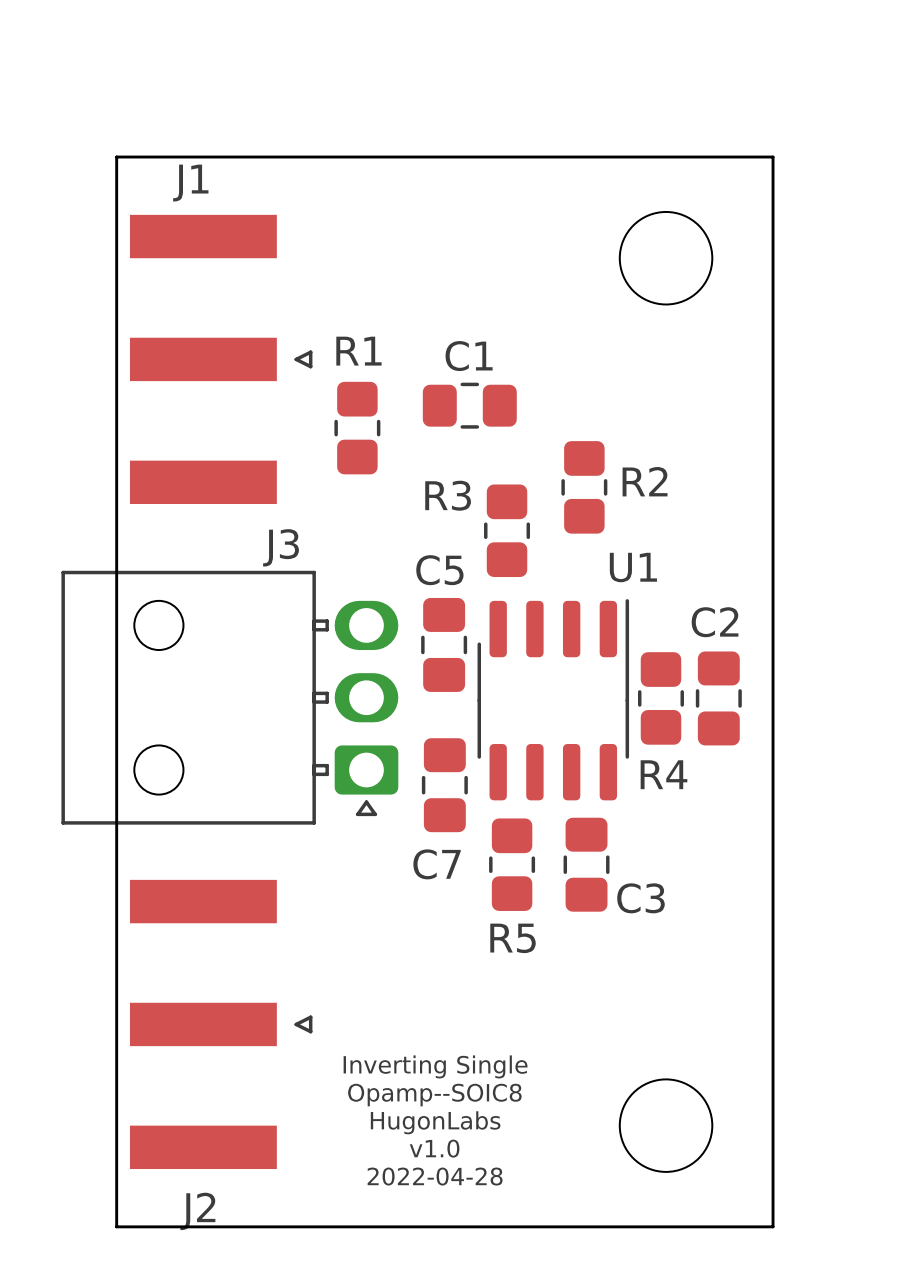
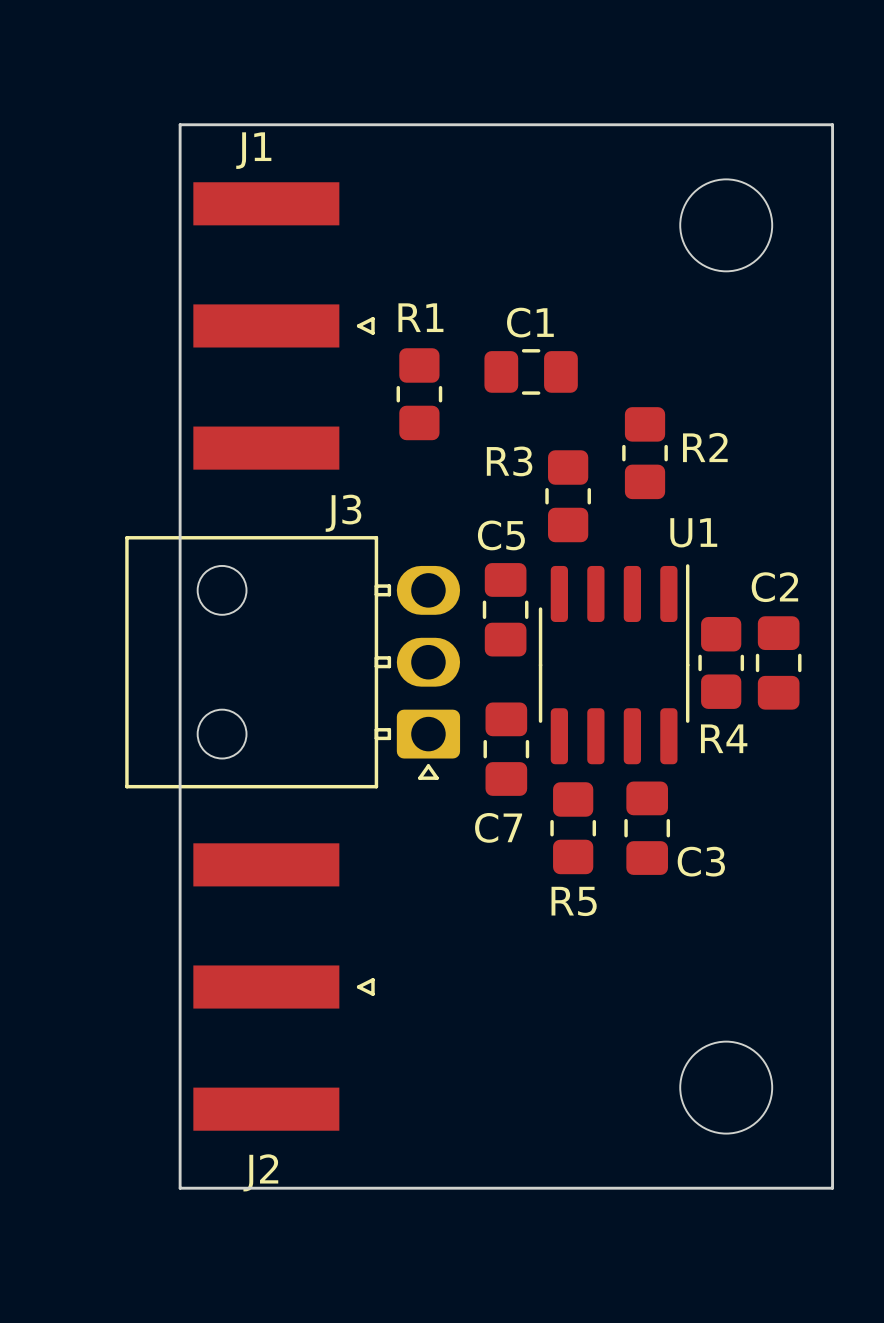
text: Inverting Single (435, 1066) -> none
text: Opamp--SOIC8 (434, 1095) -> none
text: HugonLabs (435, 1122) -> none
text: v1.0 (434, 1148) -> none
text: 2022-04-28 (435, 1176) -> none

